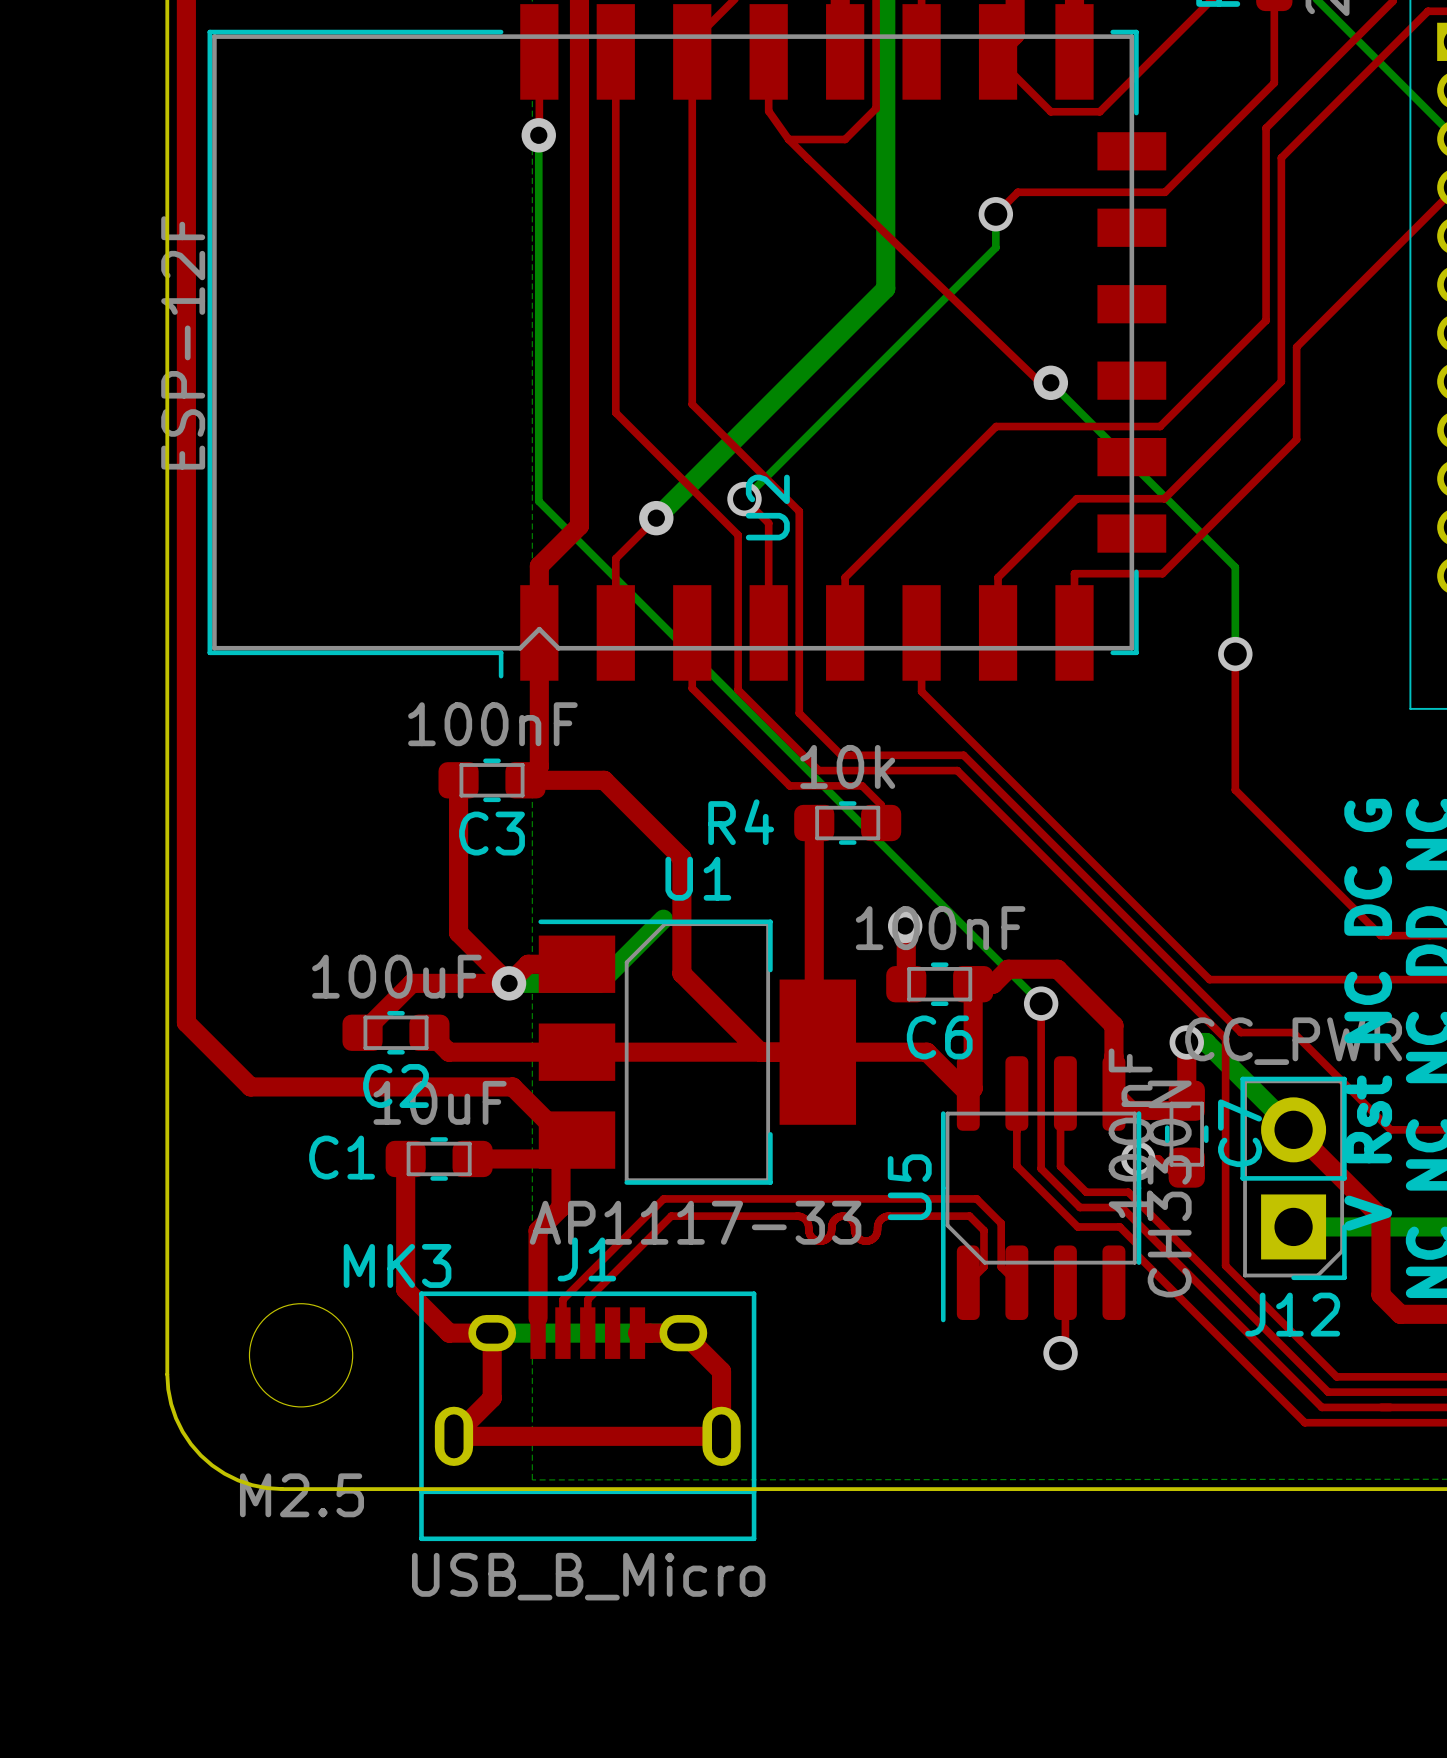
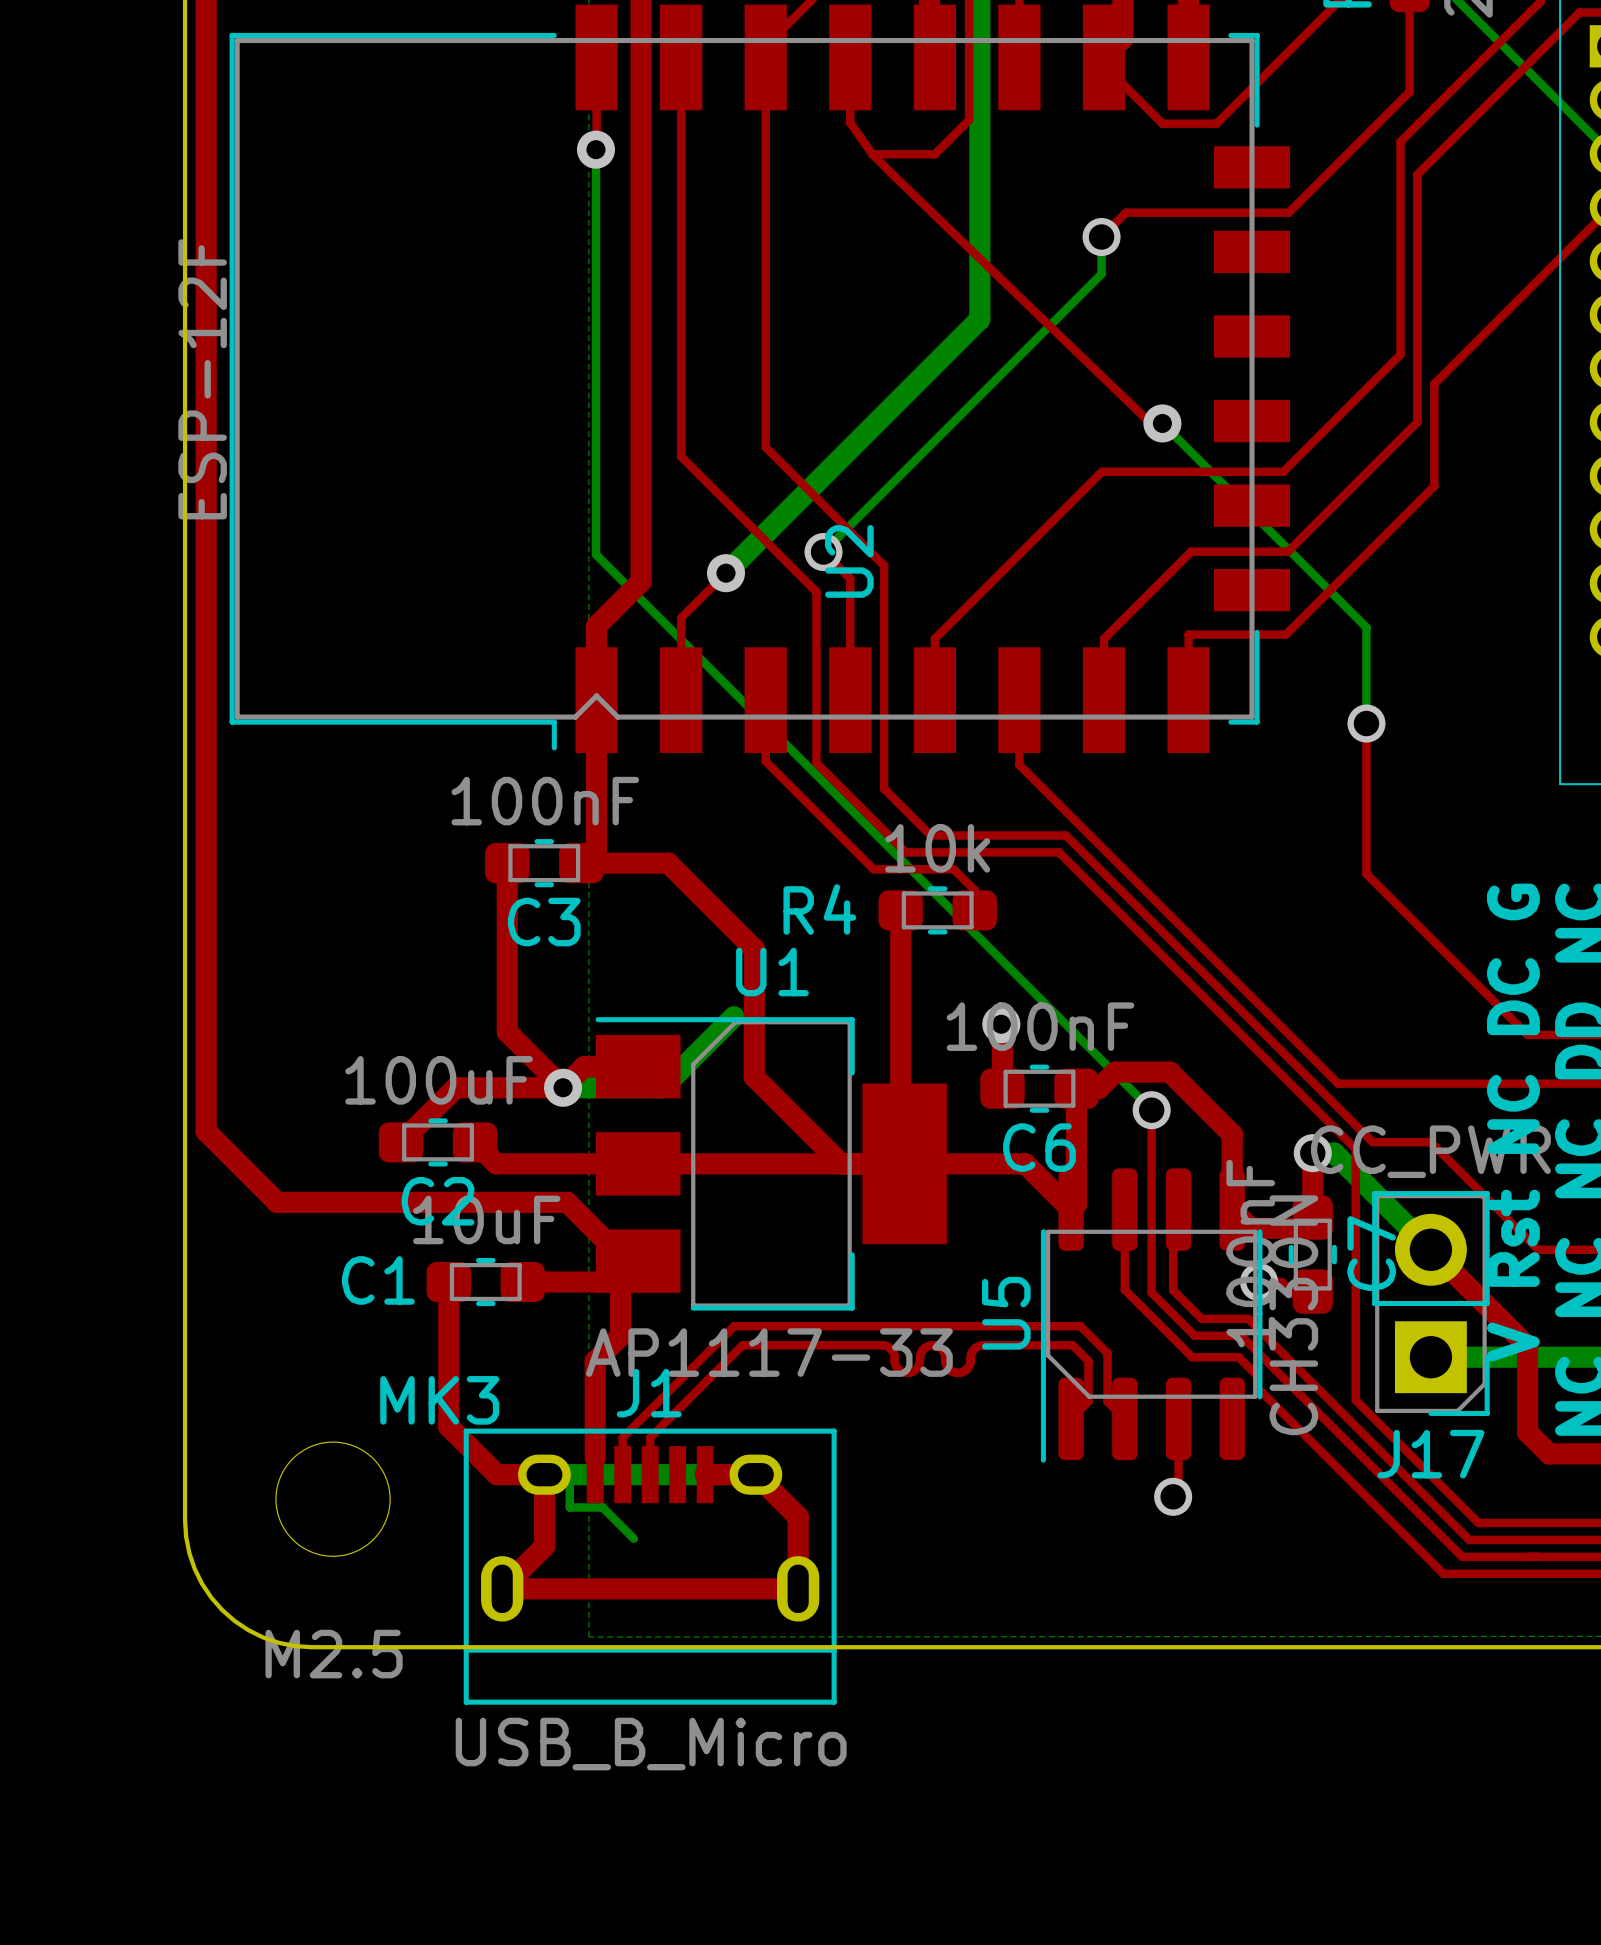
J12 name: J12 (1292, 1314) -> J17 (1430, 1454)
bottom track: none -> (569, 1474) (569, 1507) (602, 1507) (633, 1538)

